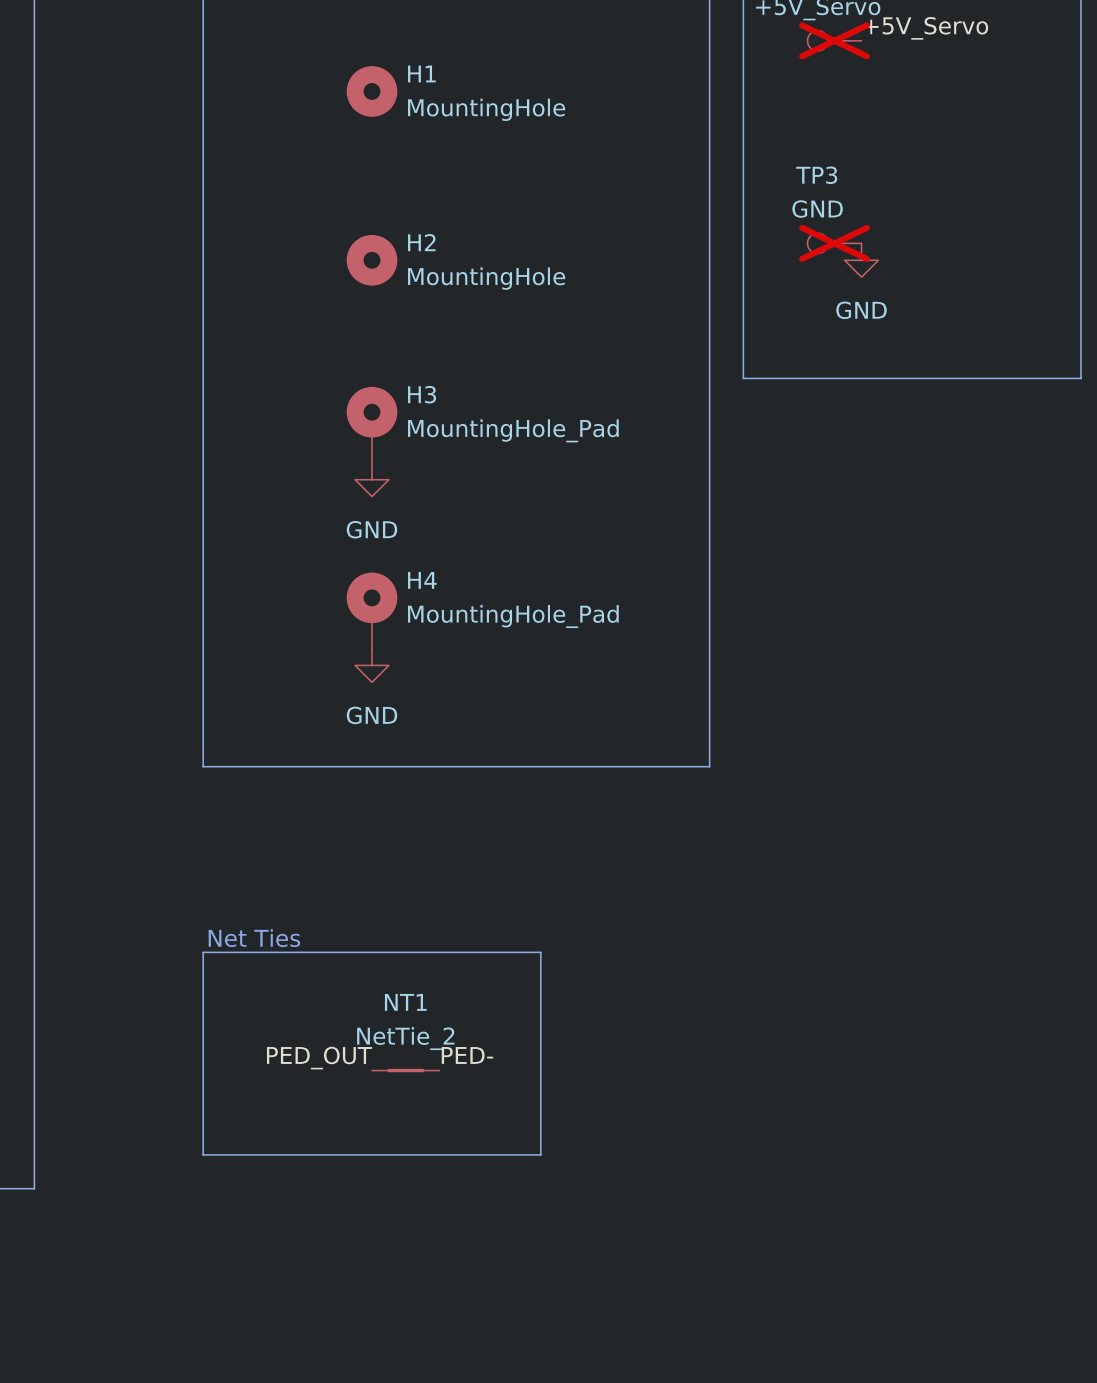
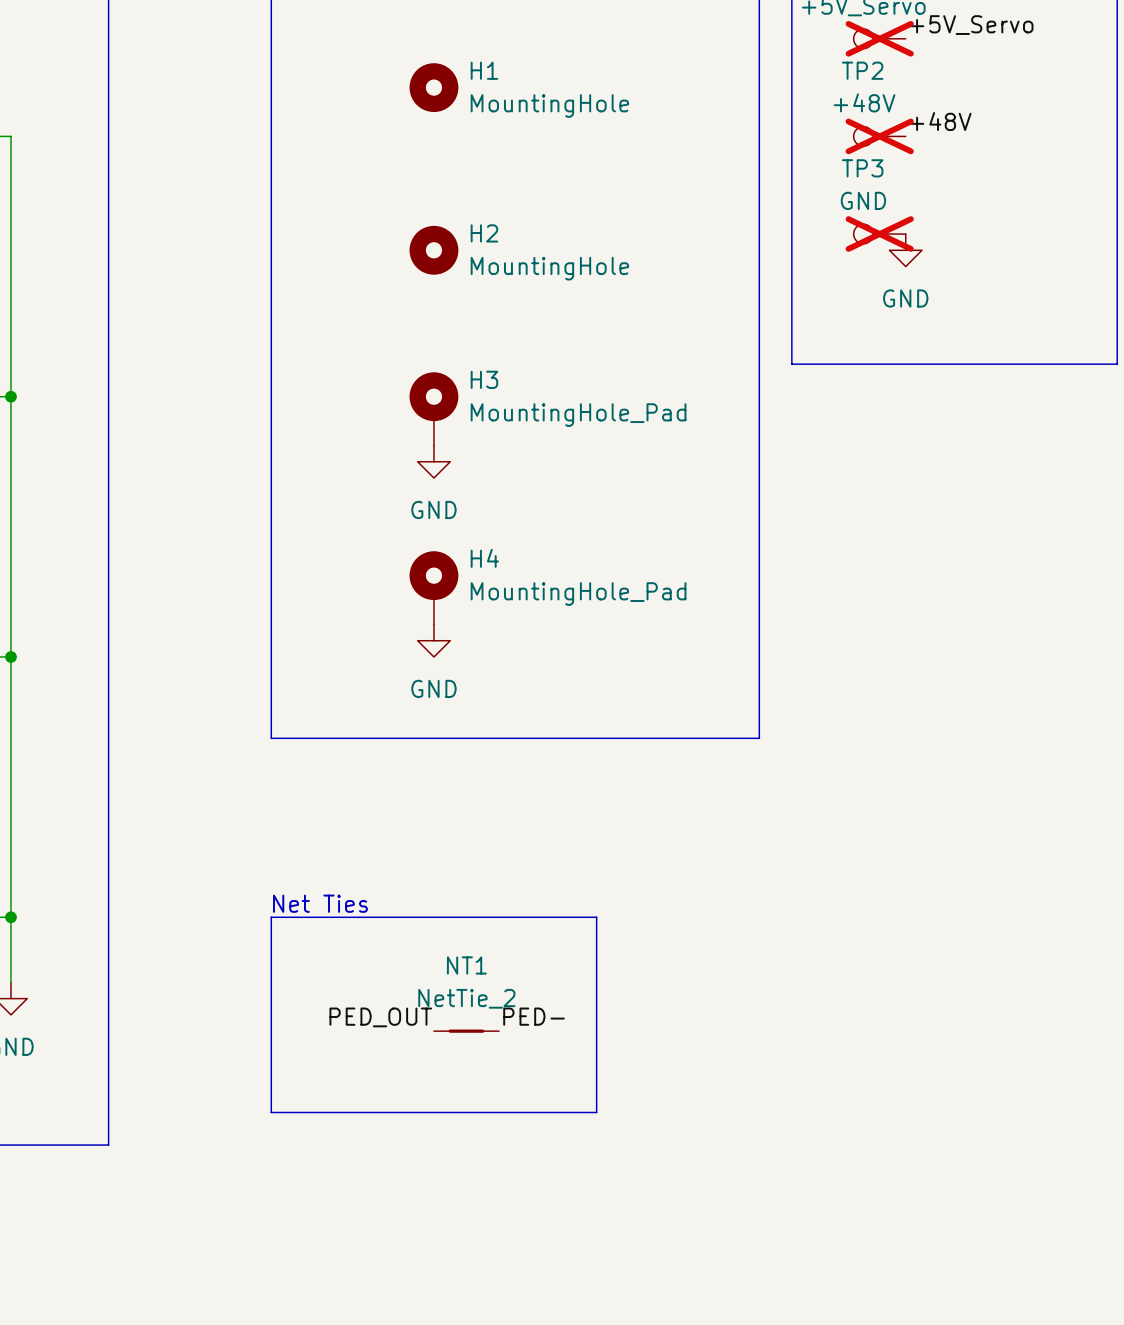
label: none -> +48V (940, 121)
TP2: none -> +48V (879, 136)

